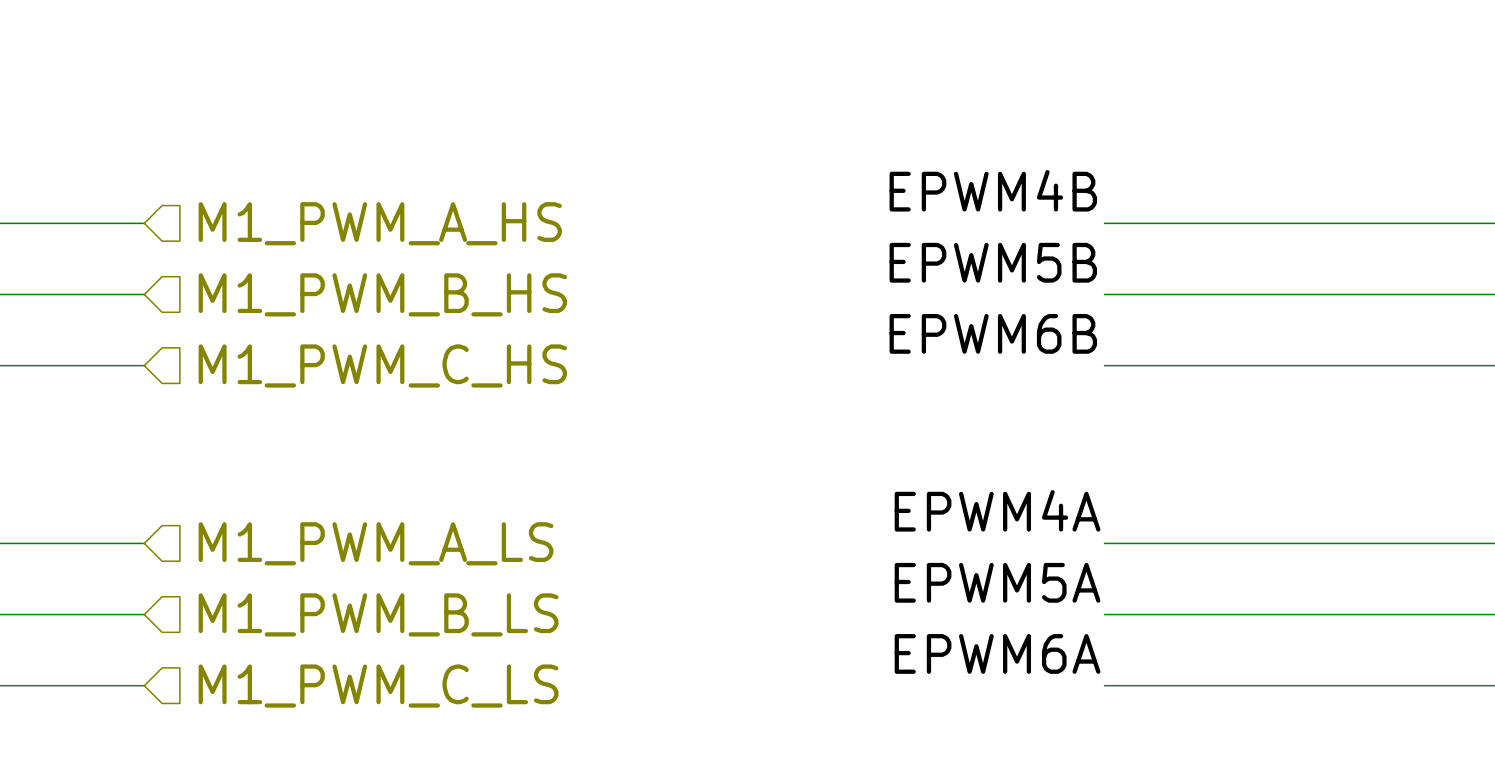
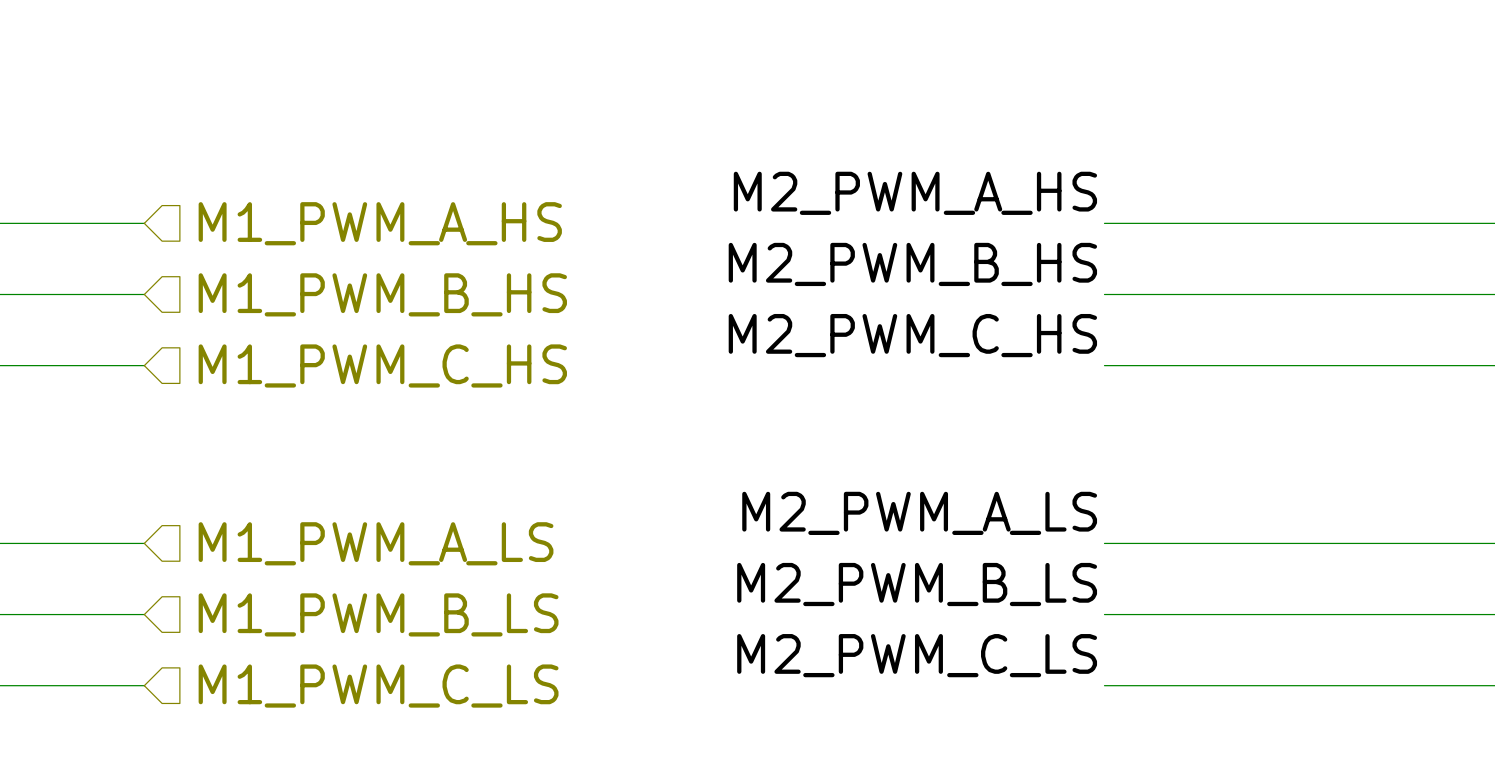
label: EPWM4B (993, 190) -> M2_PWM_A_HS (915, 193)
label: EPWM5B (993, 262) -> M2_PWM_B_HS (912, 264)
label: EPWM6B (993, 333) -> M2_PWM_C_HS (912, 335)
label: EPWM4A (997, 510) -> M2_PWM_A_LS (919, 513)
label: EPWM5A (997, 582) -> M2_PWM_B_LS (917, 584)
label: EPWM6A (997, 653) -> M2_PWM_C_LS (917, 655)

